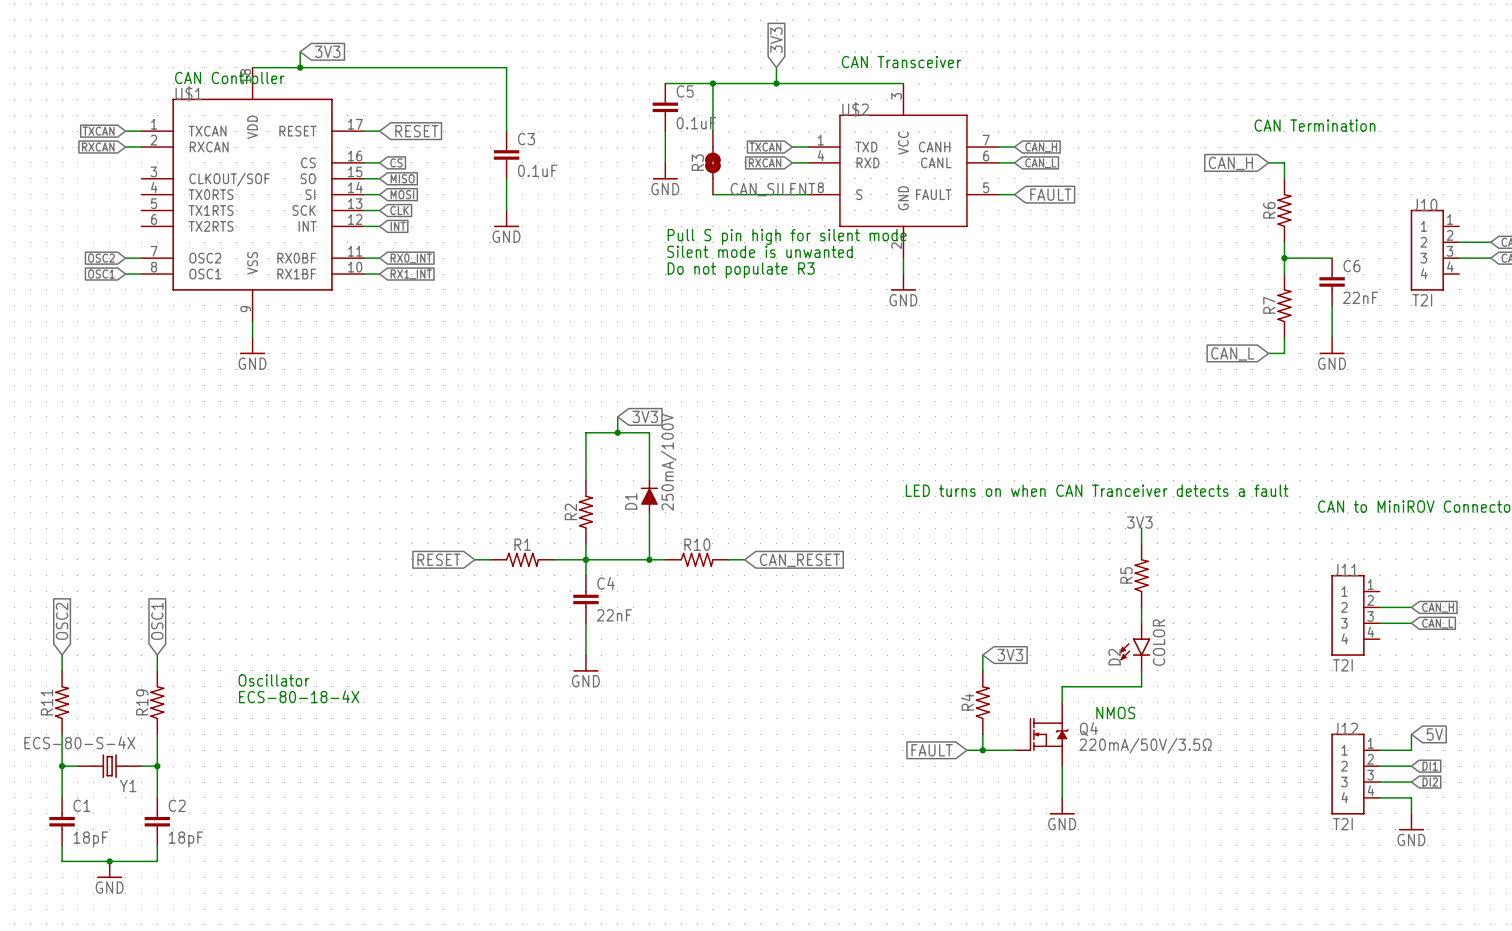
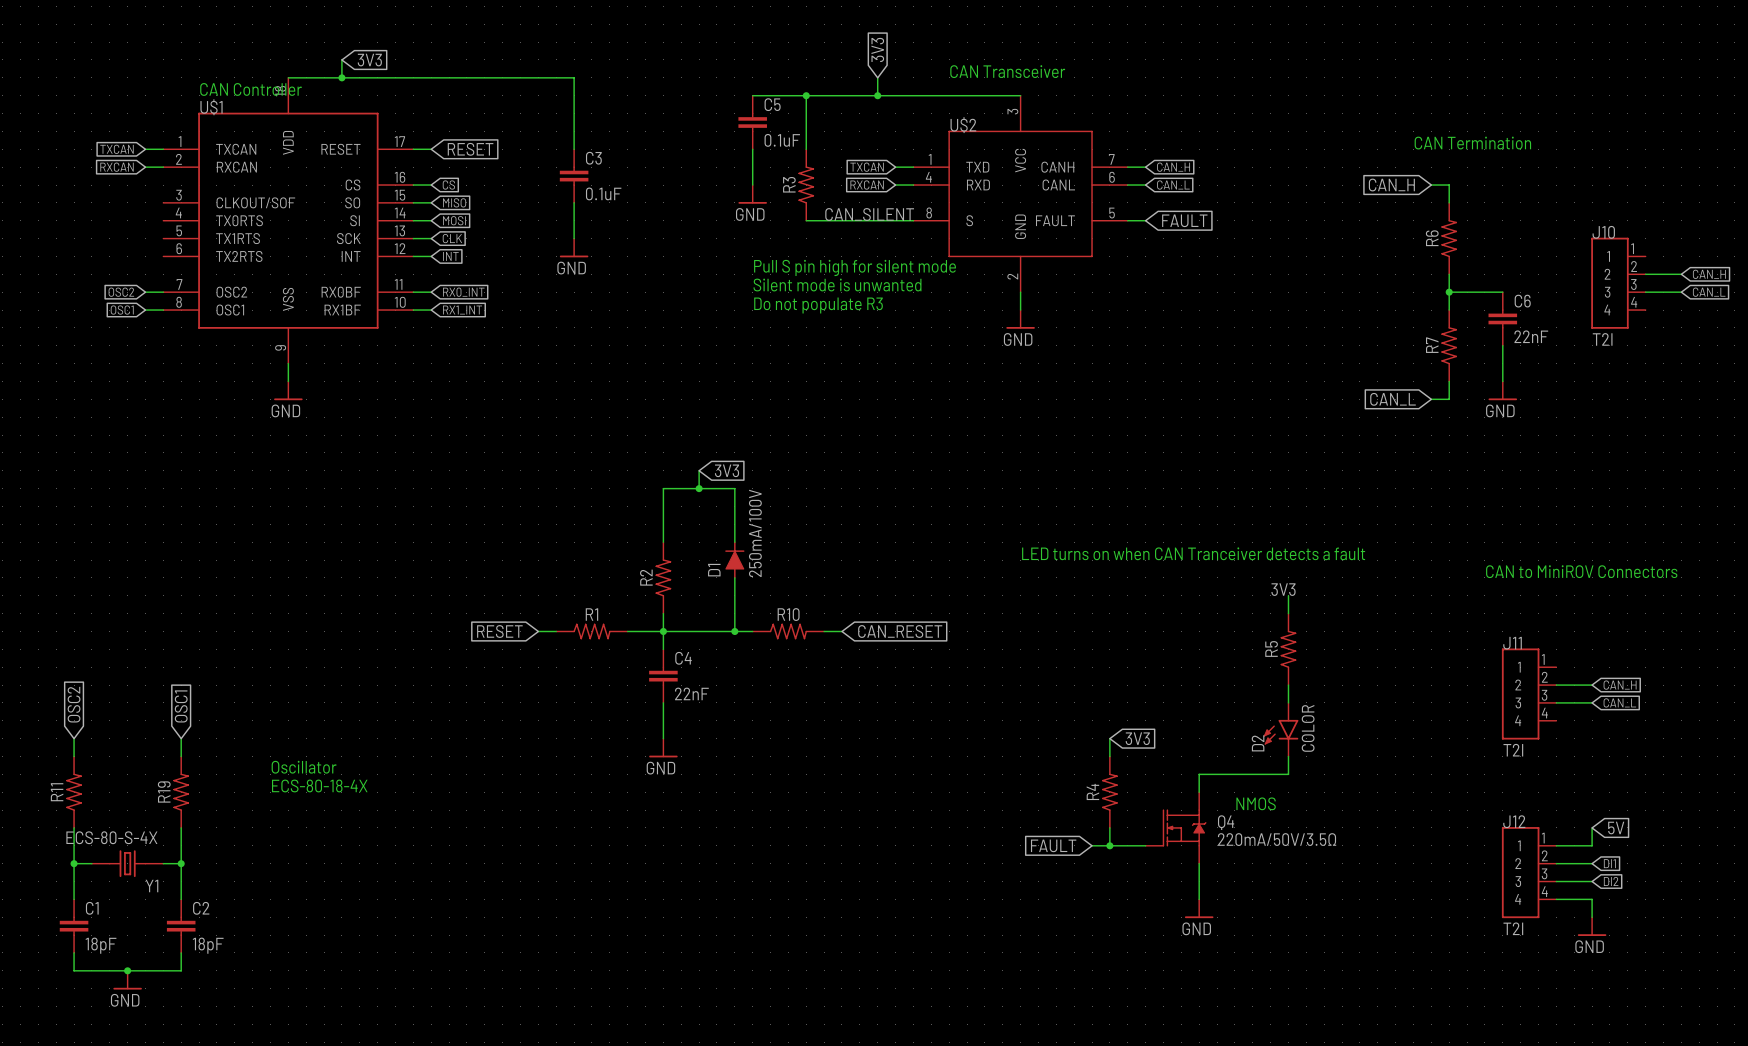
R3 symbol: [705, 131, 721, 195] -> [798, 149, 814, 221]

